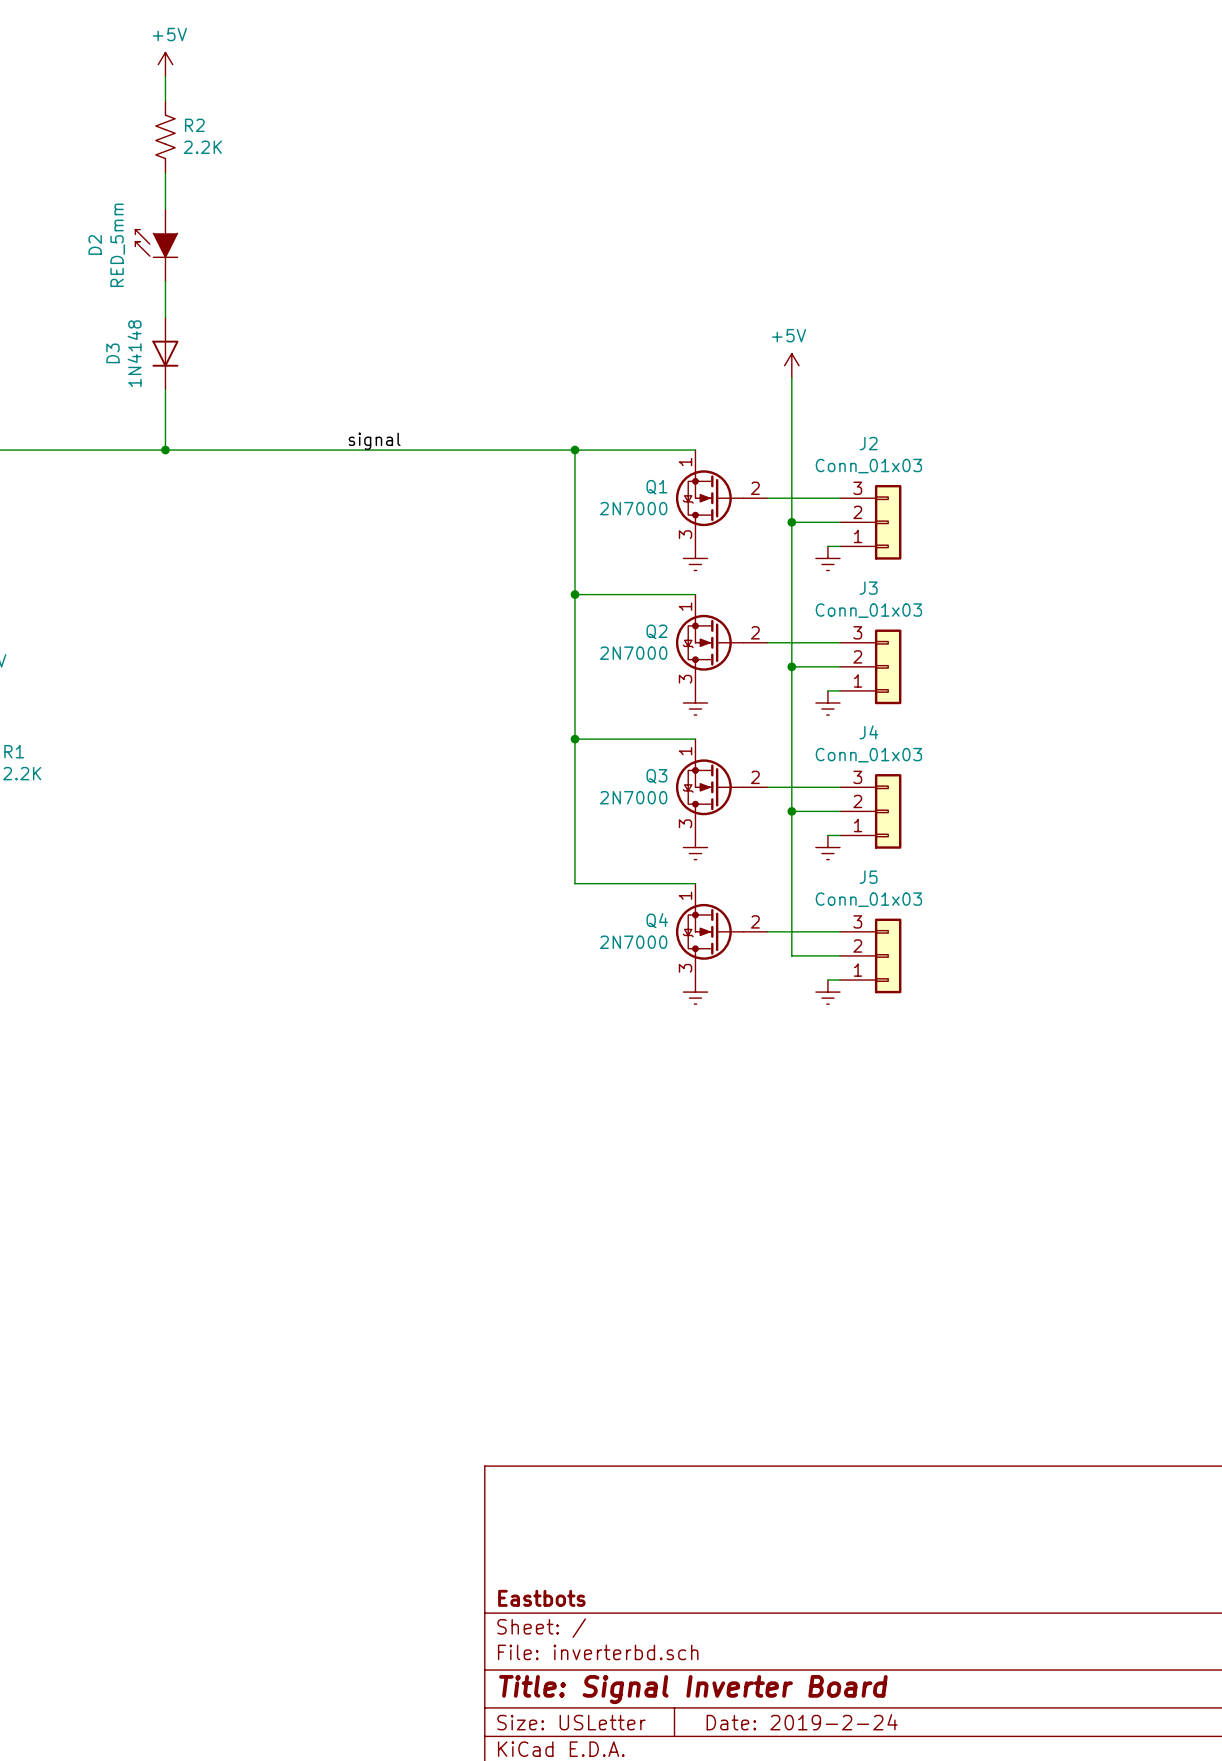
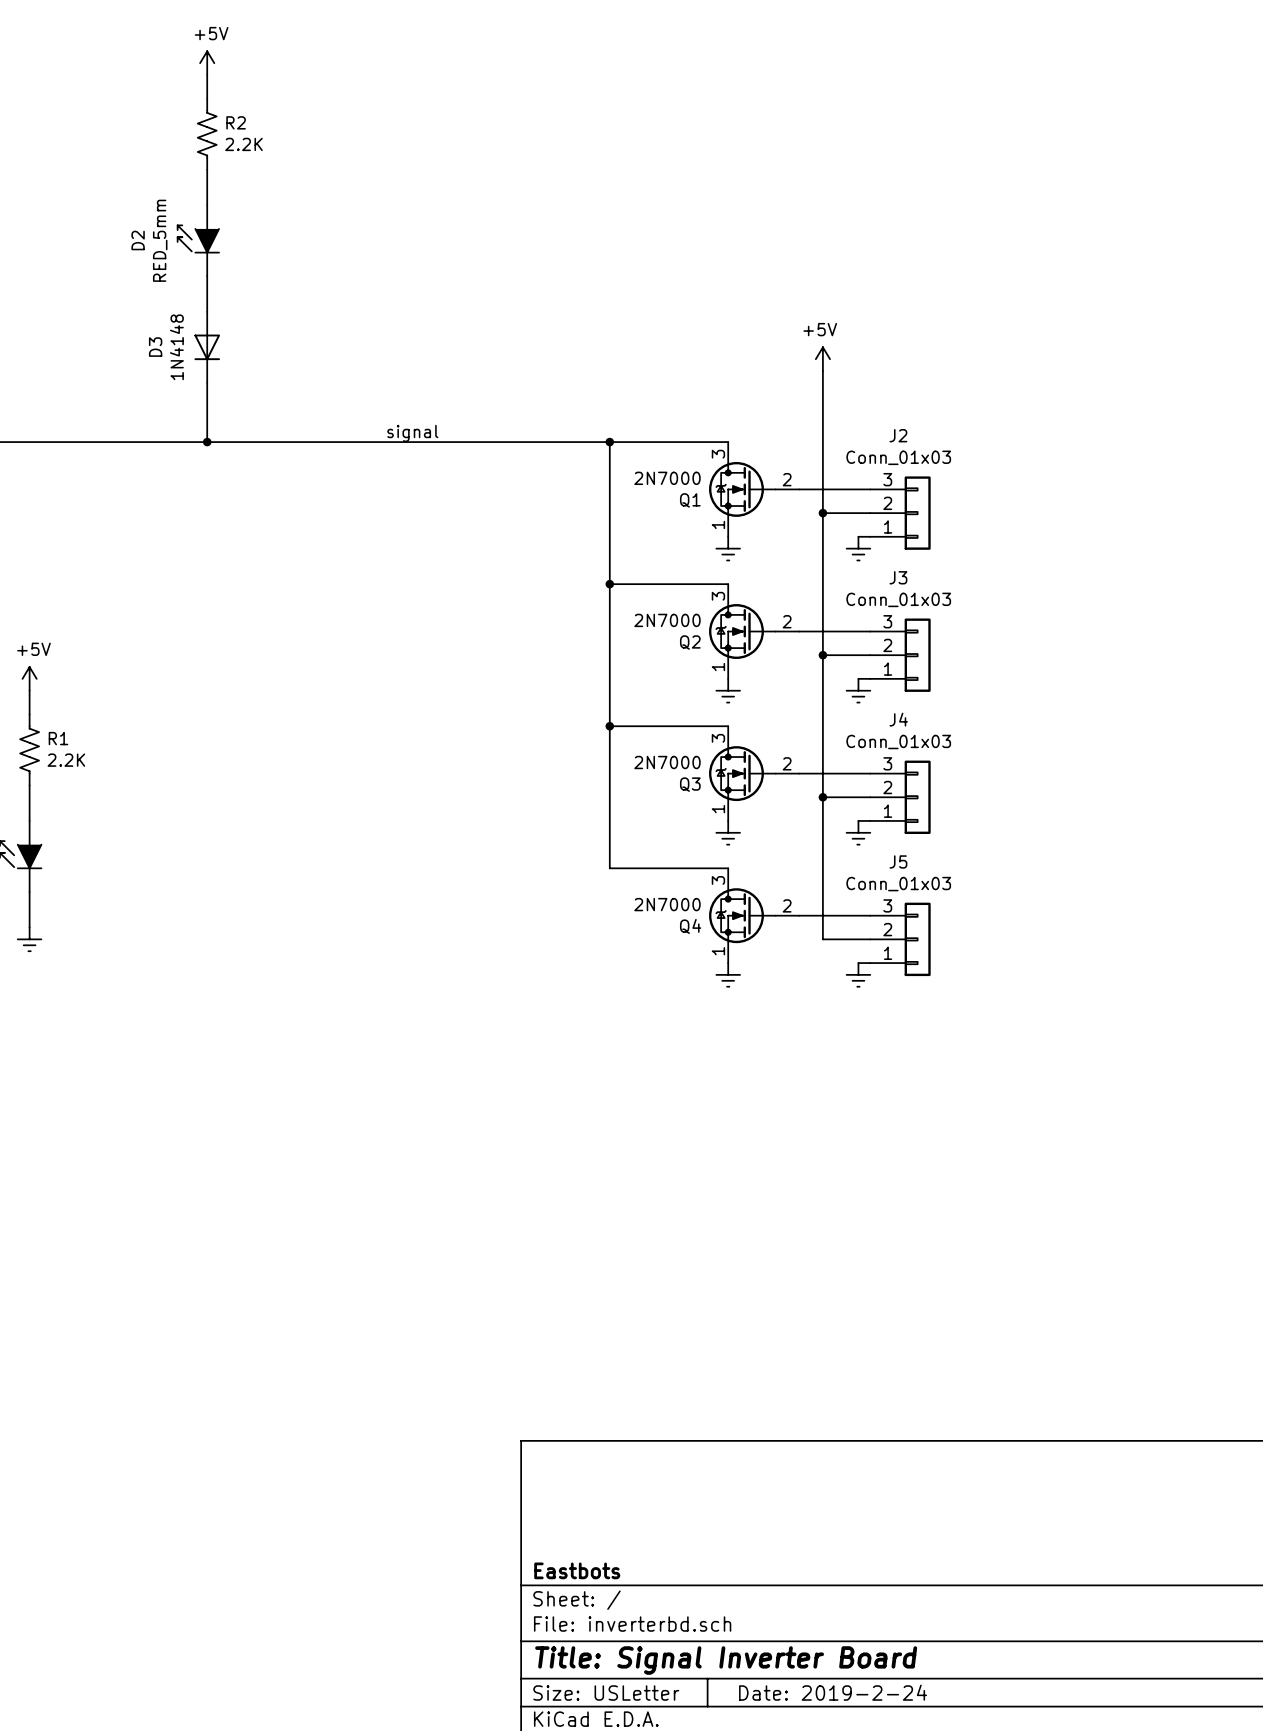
Q1 flip: as is (709, 498) -> up-down (742, 489)
Q2 flip: as is (709, 642) -> up-down (742, 631)
Q3 flip: as is (709, 787) -> up-down (742, 773)
Q4 flip: as is (709, 931) -> up-down (742, 915)

